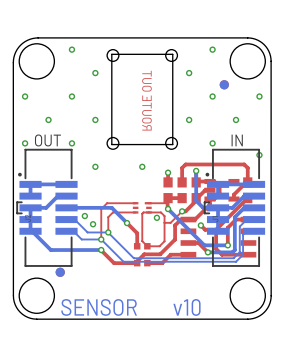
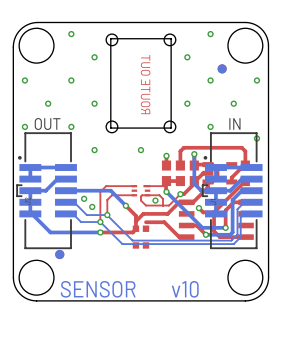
top track: (142, 217) (142, 241) (147, 246) (159, 246) (164, 241) (164, 222) -> (140, 200) (145, 205) (163, 205)
top track: (175, 225) (175, 239) (160, 254) (144, 254) (137, 263) (114, 263) (101, 250) -> (173, 208) (167, 213) (143, 213) (135, 221)
top track: none -> (135, 228) (132, 232) (100, 232)
top track: (180, 254) (170, 254) (162, 263) (147, 263) -> (179, 237) (164, 222) (145, 222)

